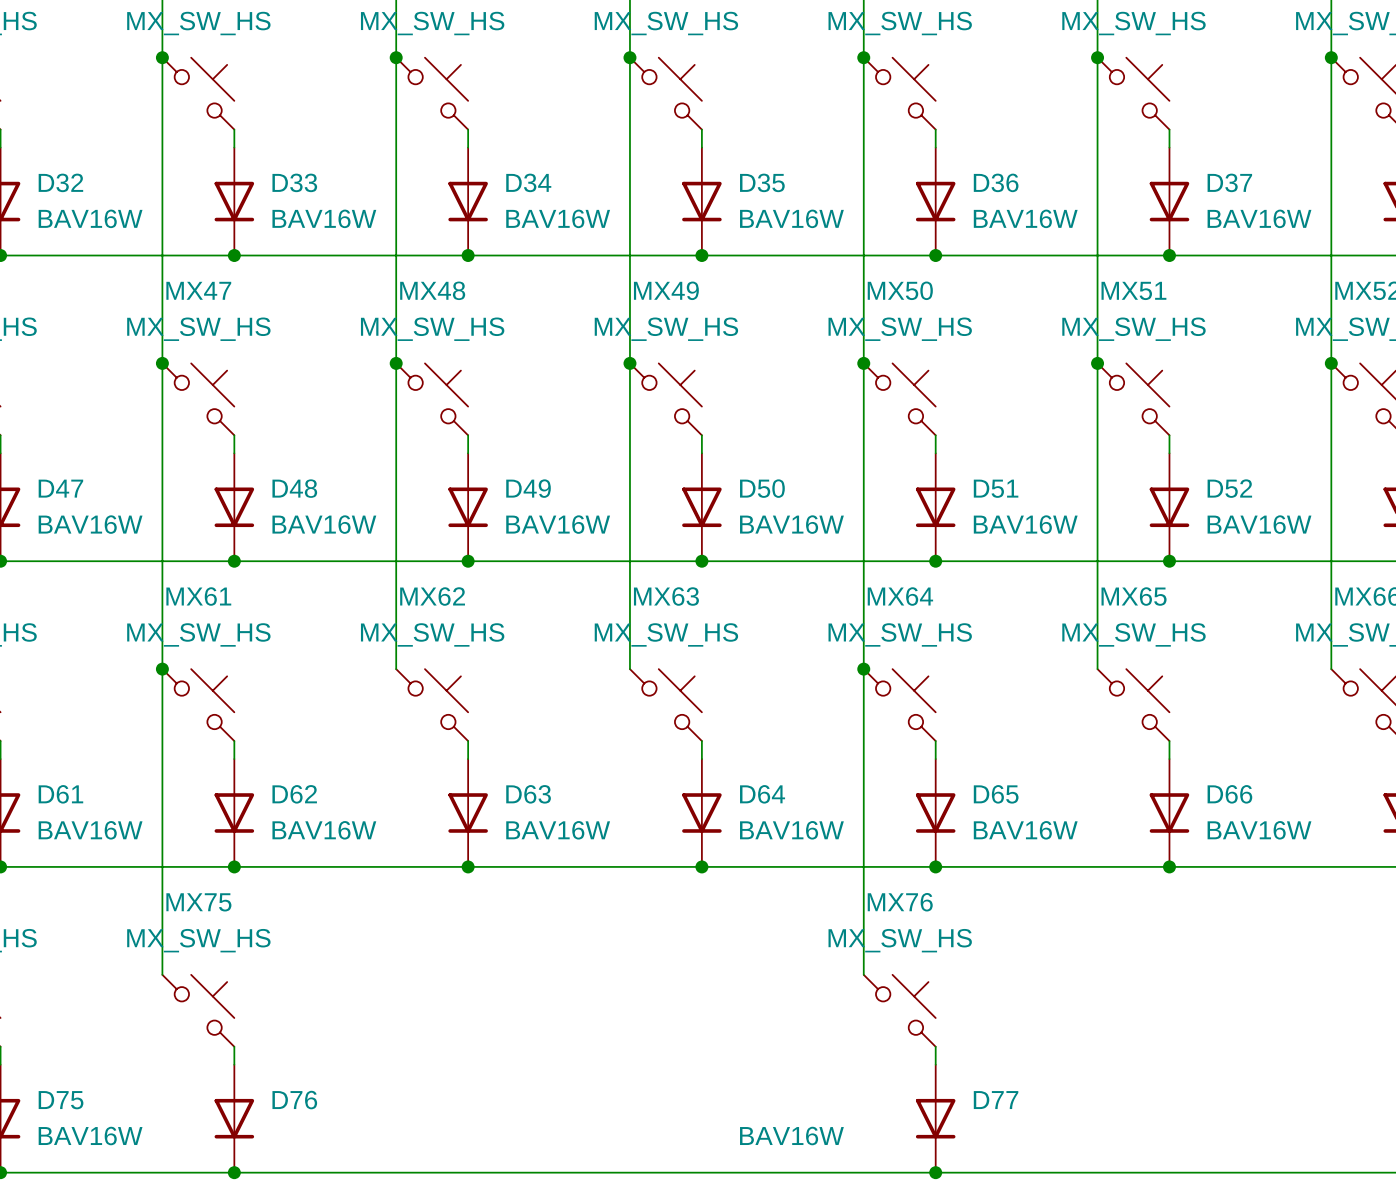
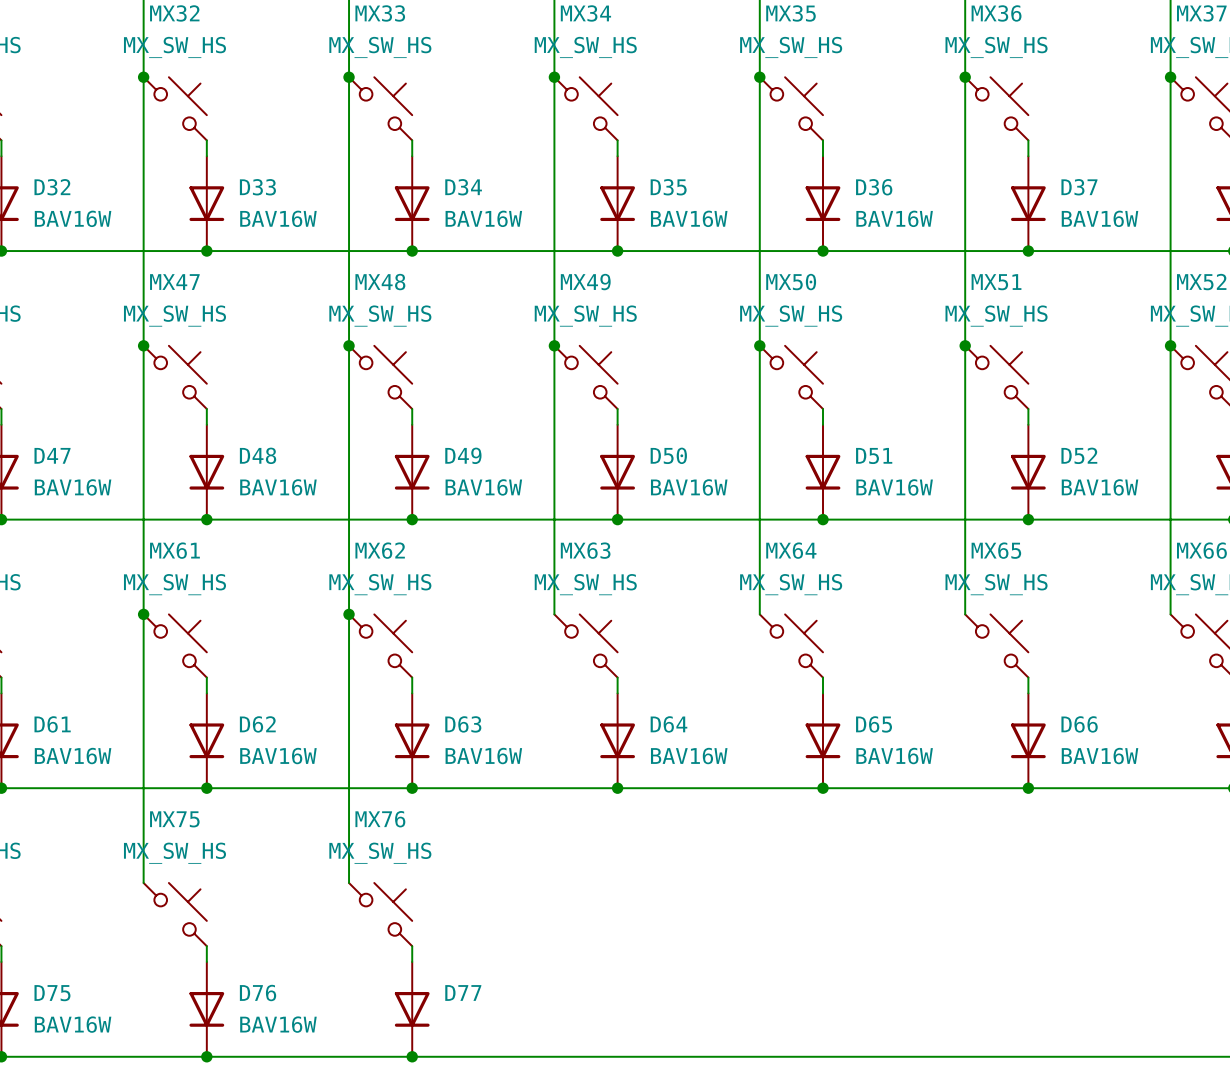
wire: none -> (349, 614) (349, 882)
junction: none -> (349, 614)
wire: (863, 669) (863, 974) -> none
junction: (863, 669) -> none
MX76 position: (899, 1010) -> (380, 914)
wire: none -> (412, 946) (412, 961)
wire: (935, 1046) (935, 1064) -> none
D77 position: (935, 1118) -> (412, 1009)
D76 value position: BAV16W (791, 1136) -> BAV16W (278, 1024)
junction: none -> (412, 1056)
junction: (935, 1172) -> none

